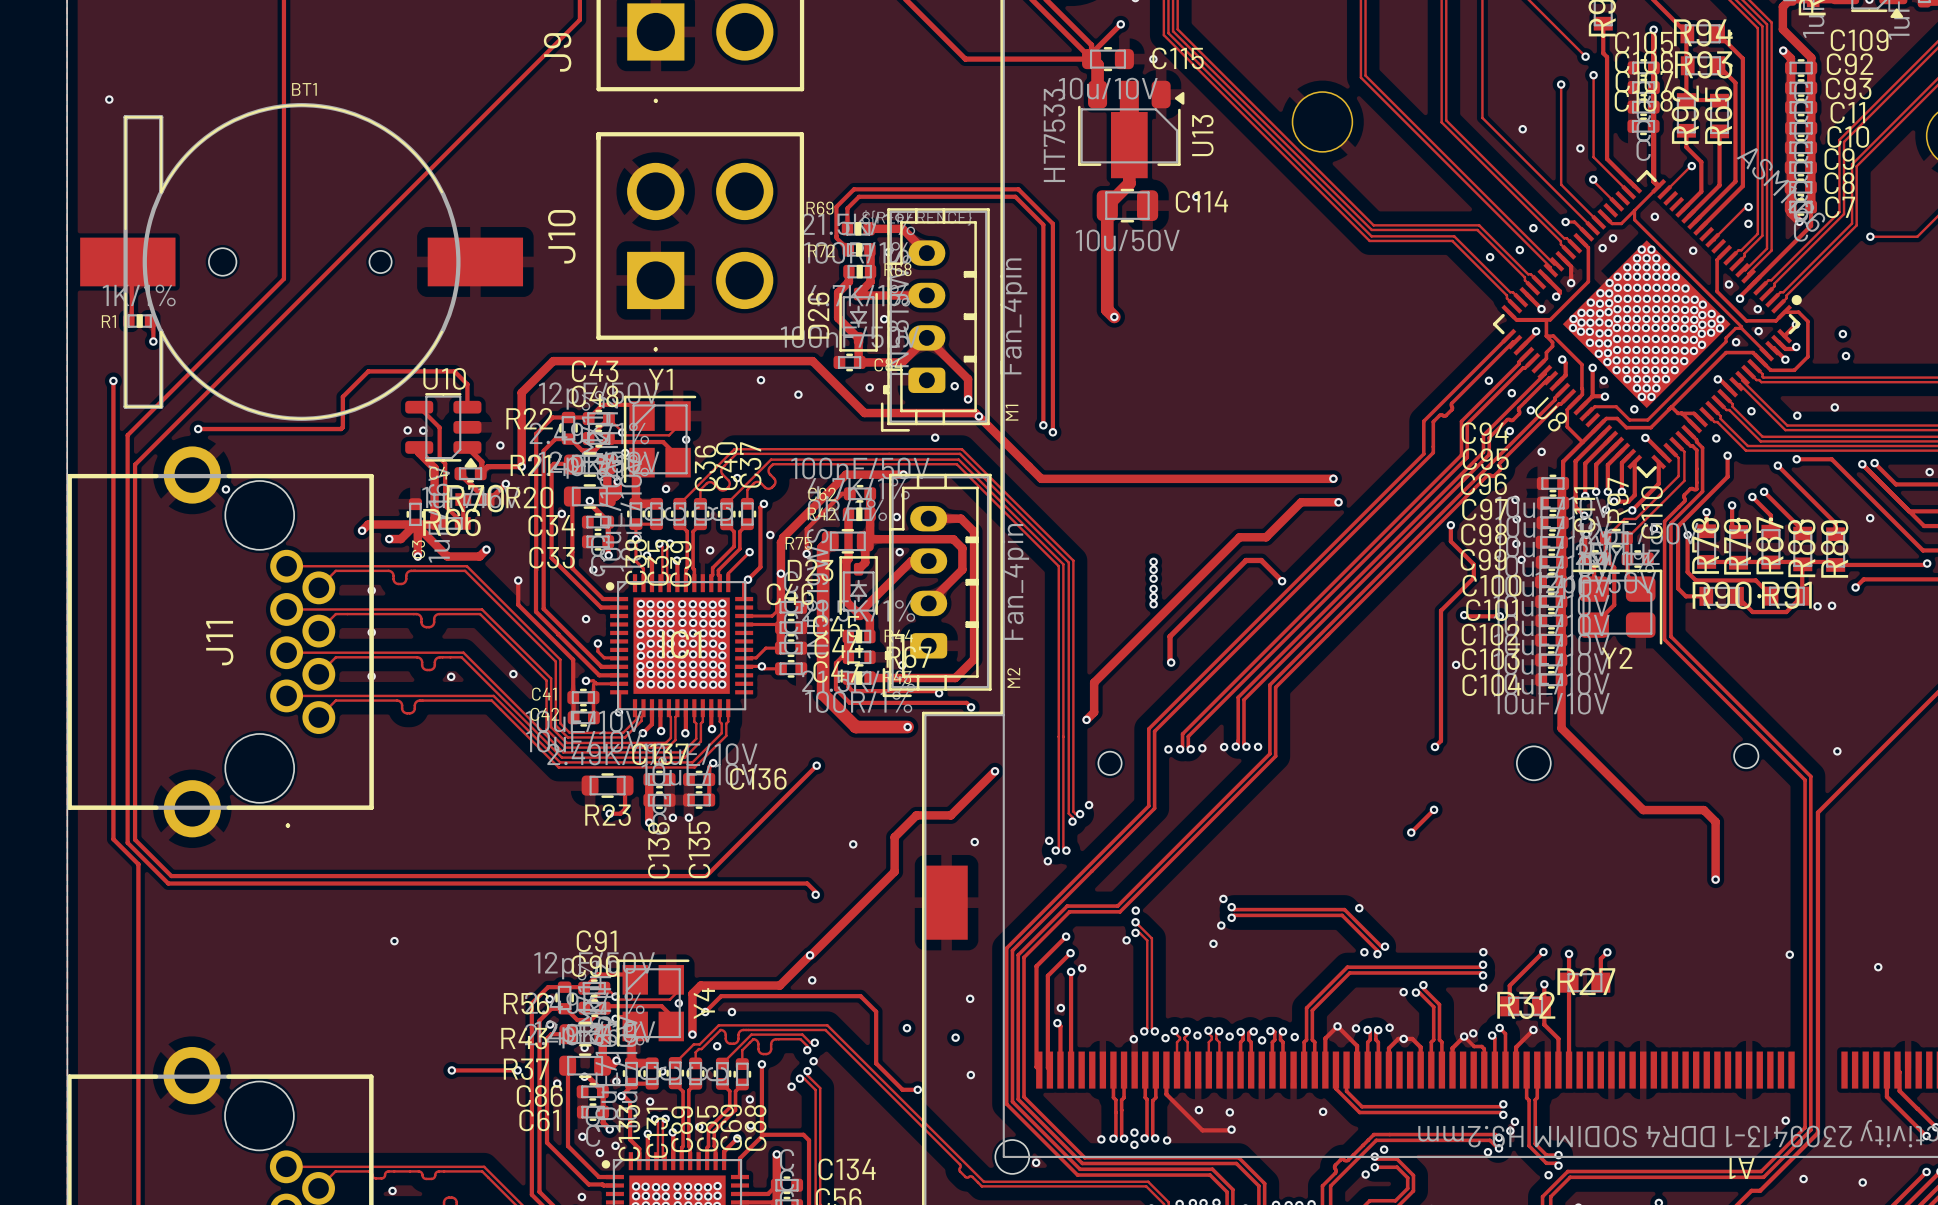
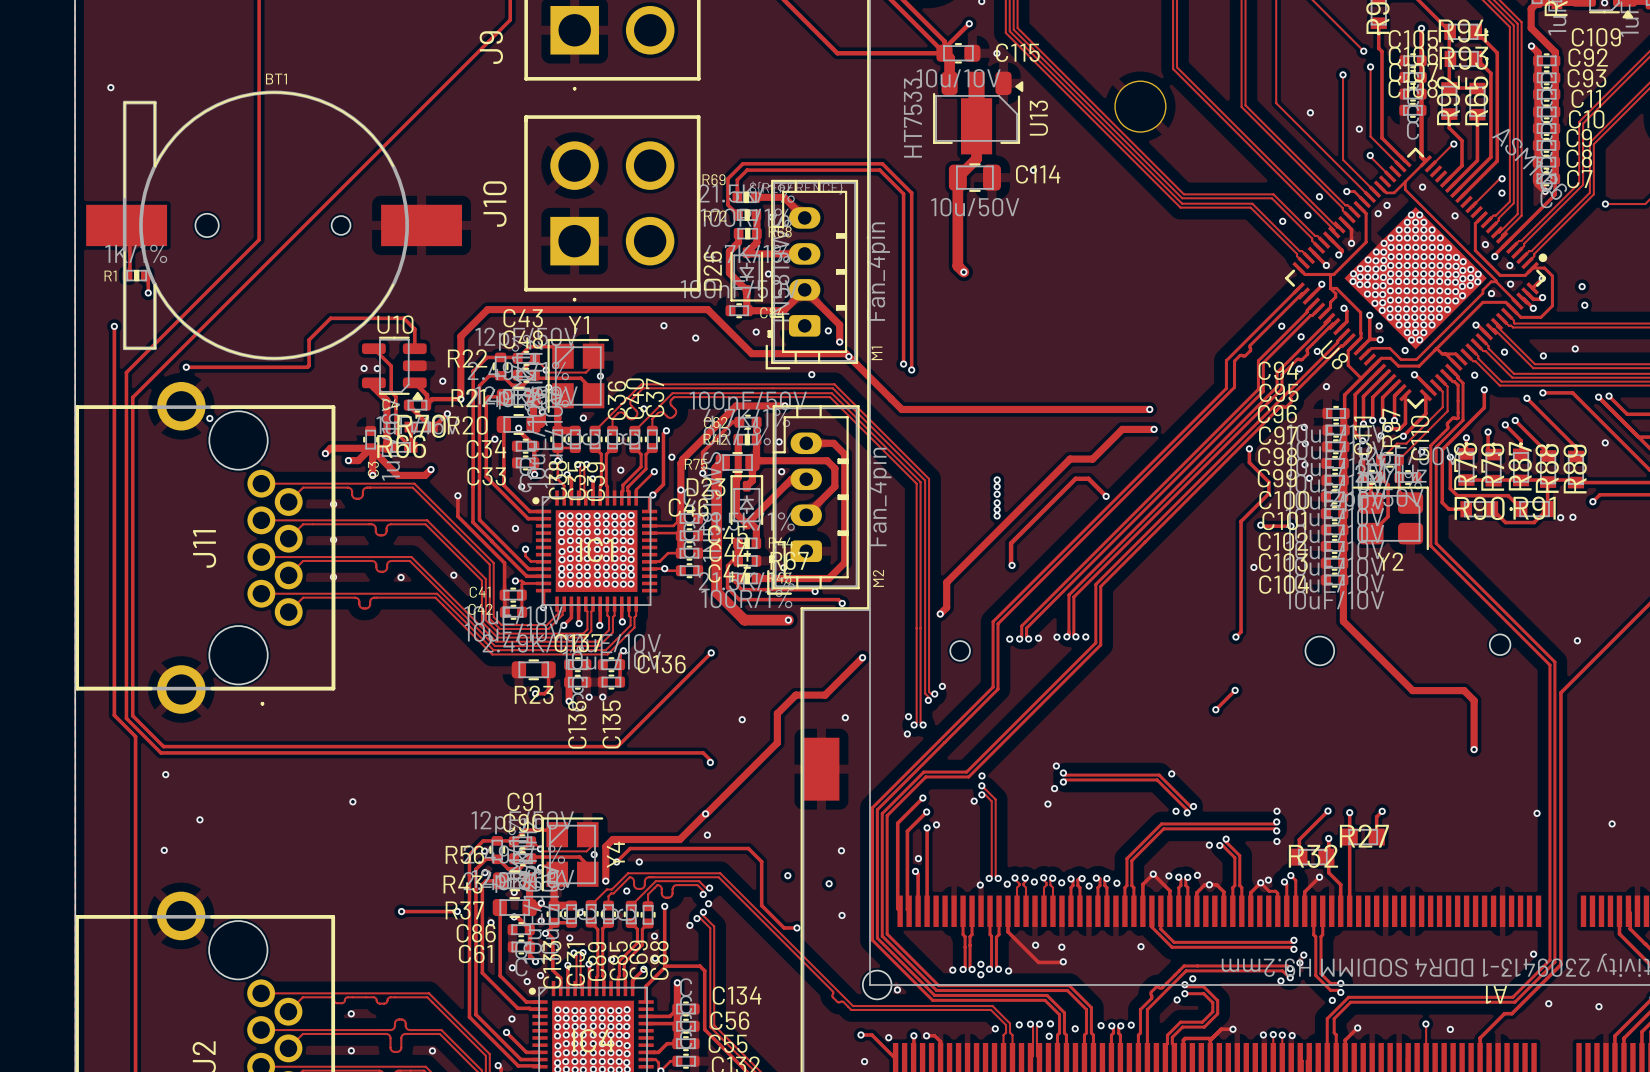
via: none -> (165, 774)
via: none -> (199, 819)
via: none -> (164, 850)

